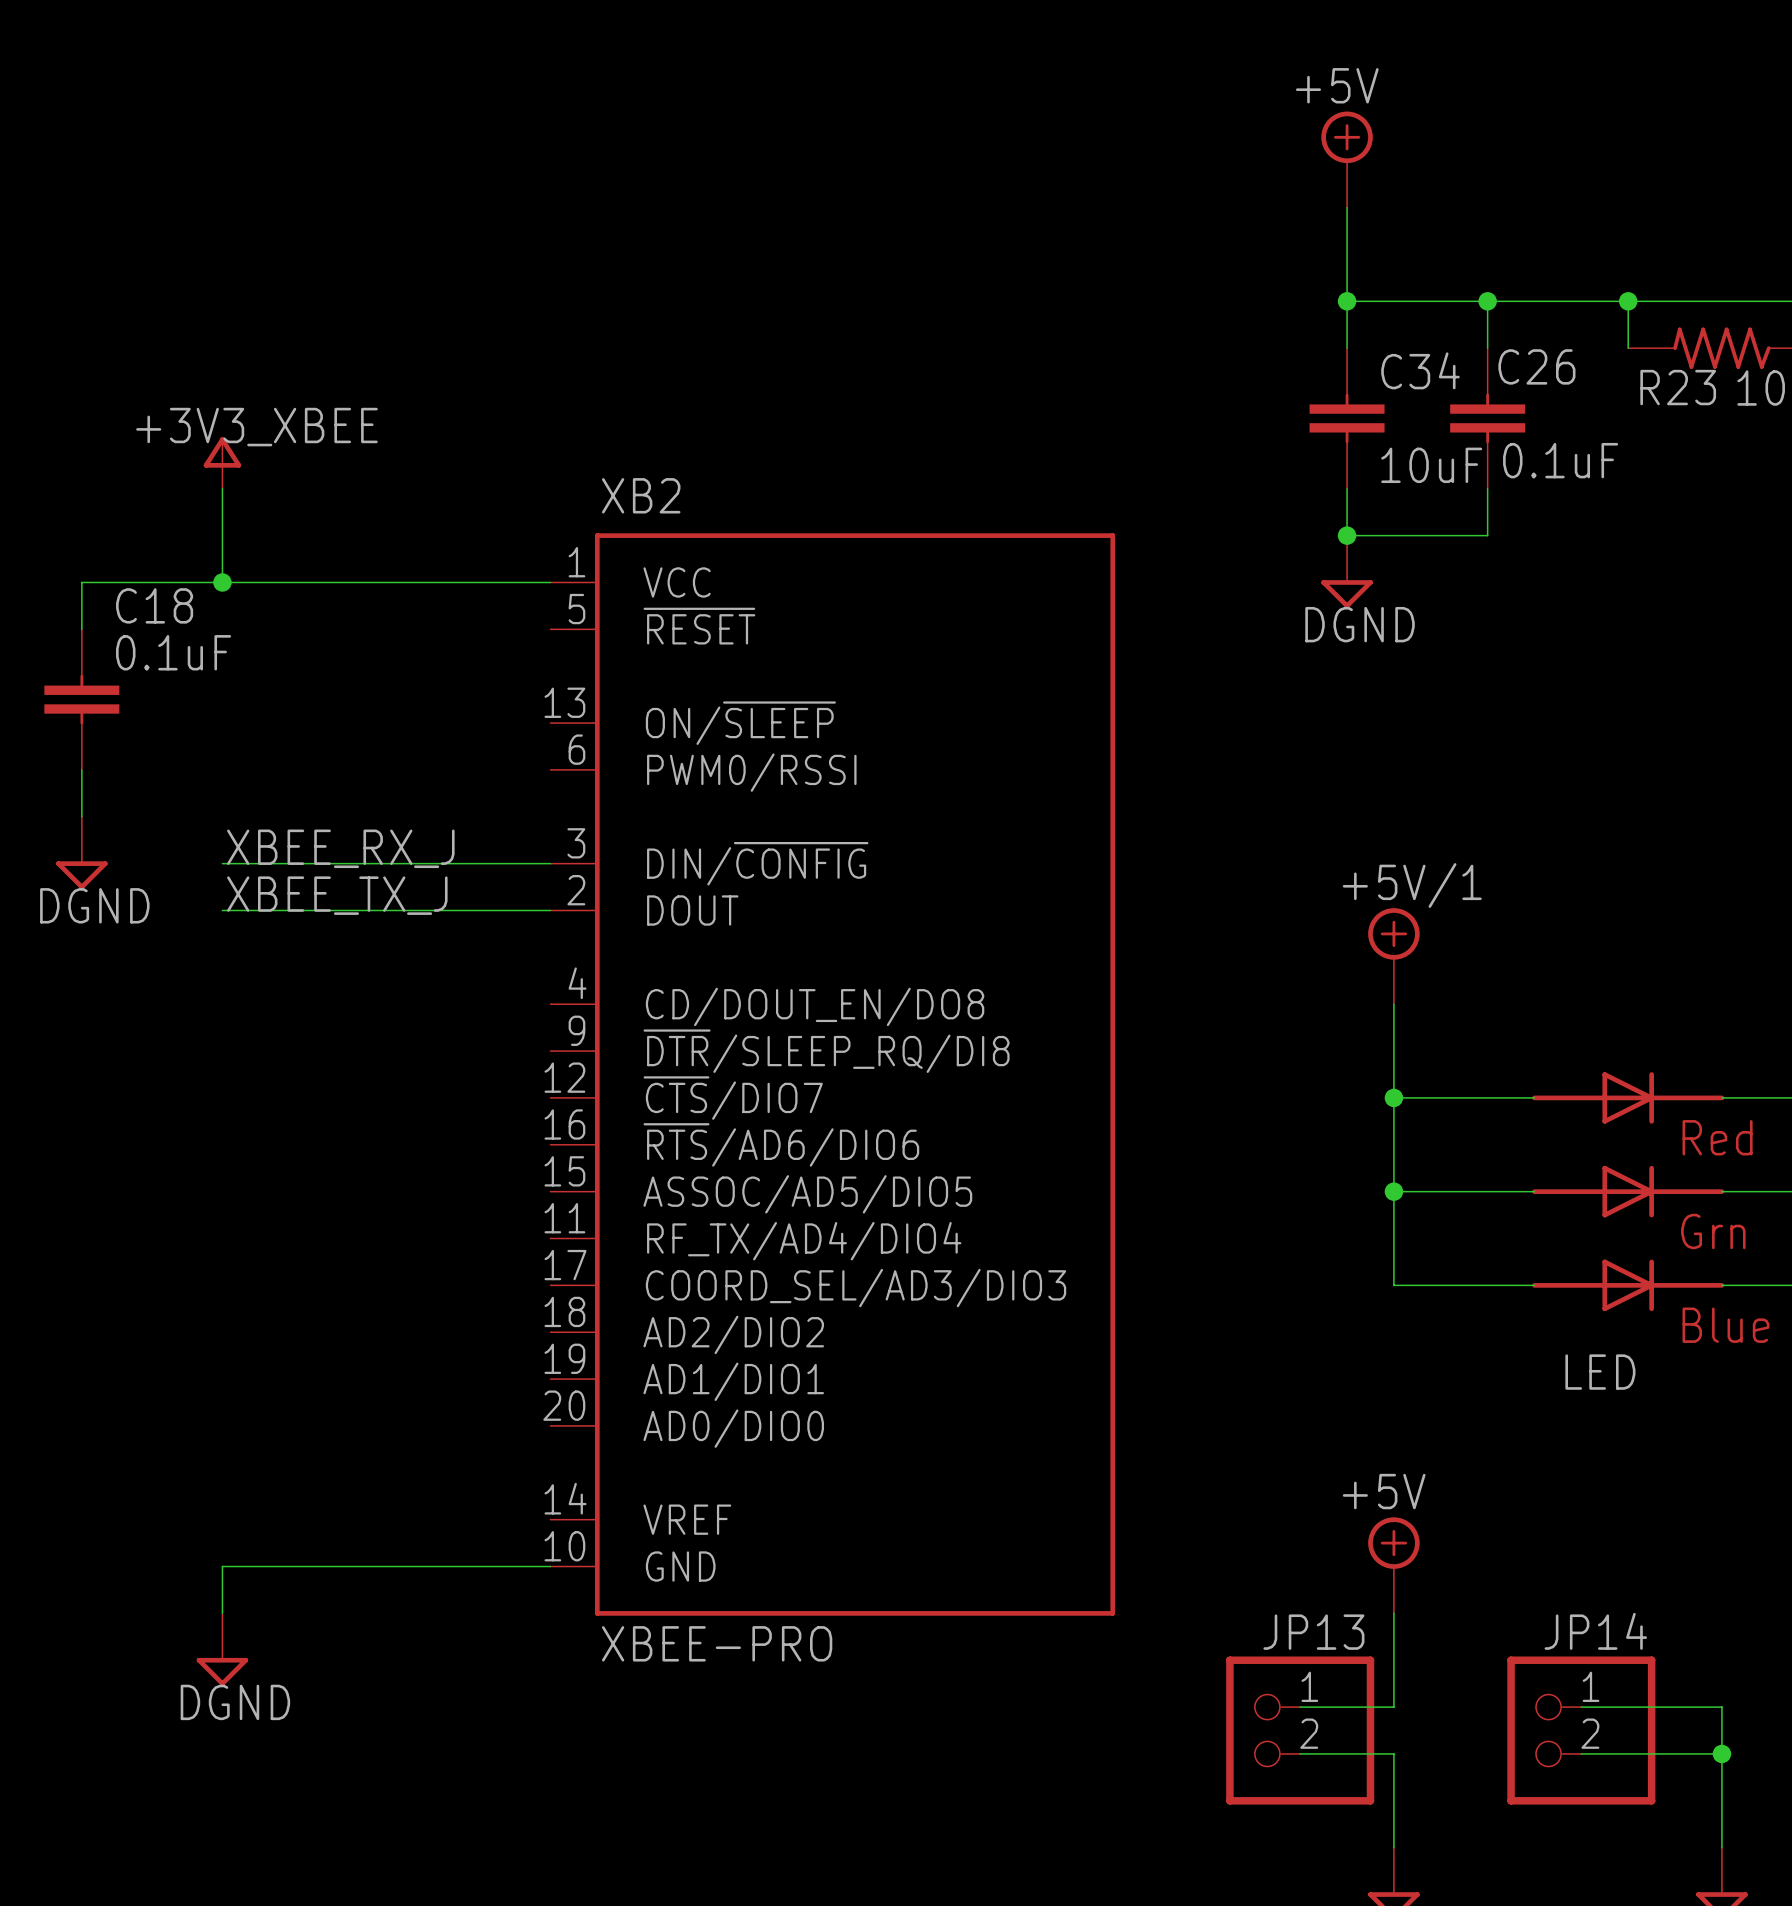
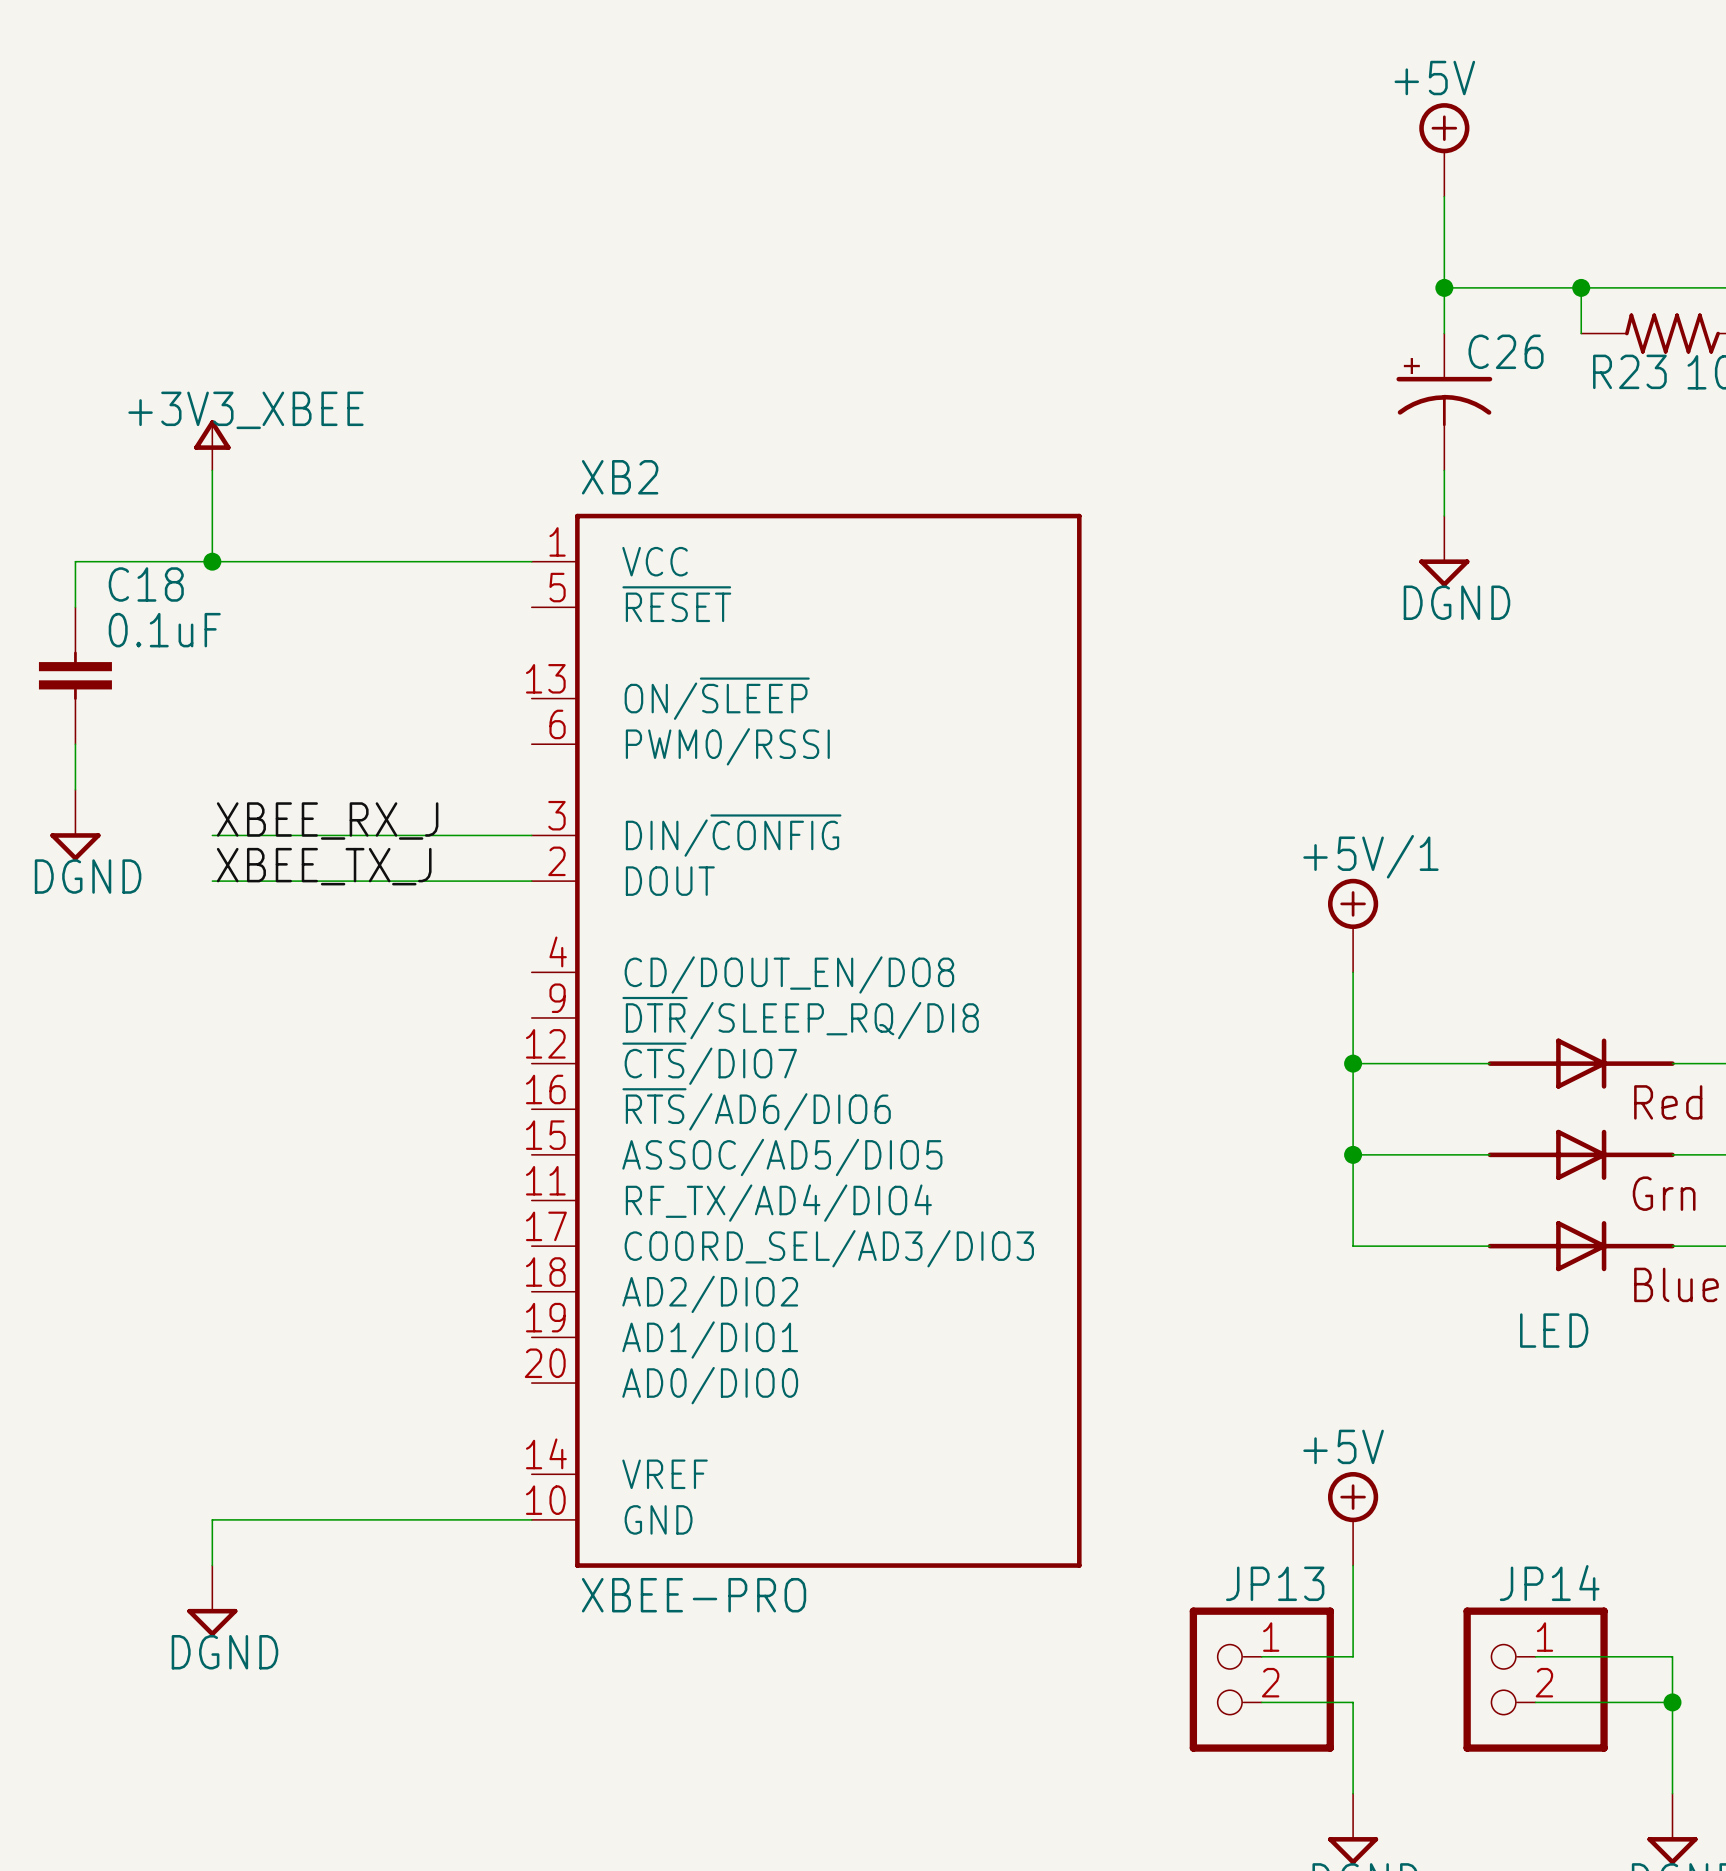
power symbol position: +5V (1347, 159) -> +5V (1444, 149)
wire: (1347, 207) (1347, 348) -> none
wire: (1347, 301) (1487, 301) -> (1444, 196) (1444, 287)
junction: (1347, 301) -> none
C26 symbol: [1450, 348, 1526, 489] -> [1396, 333, 1493, 471]
C34: 10uF (1347, 418) -> none
C26 value: 0.1uF (1560, 460) -> none
wire: (1347, 488) (1347, 535) (1487, 535) -> none
junction: (1347, 535) -> none
power symbol position: DGND (1347, 571) -> DGND (1444, 551)

